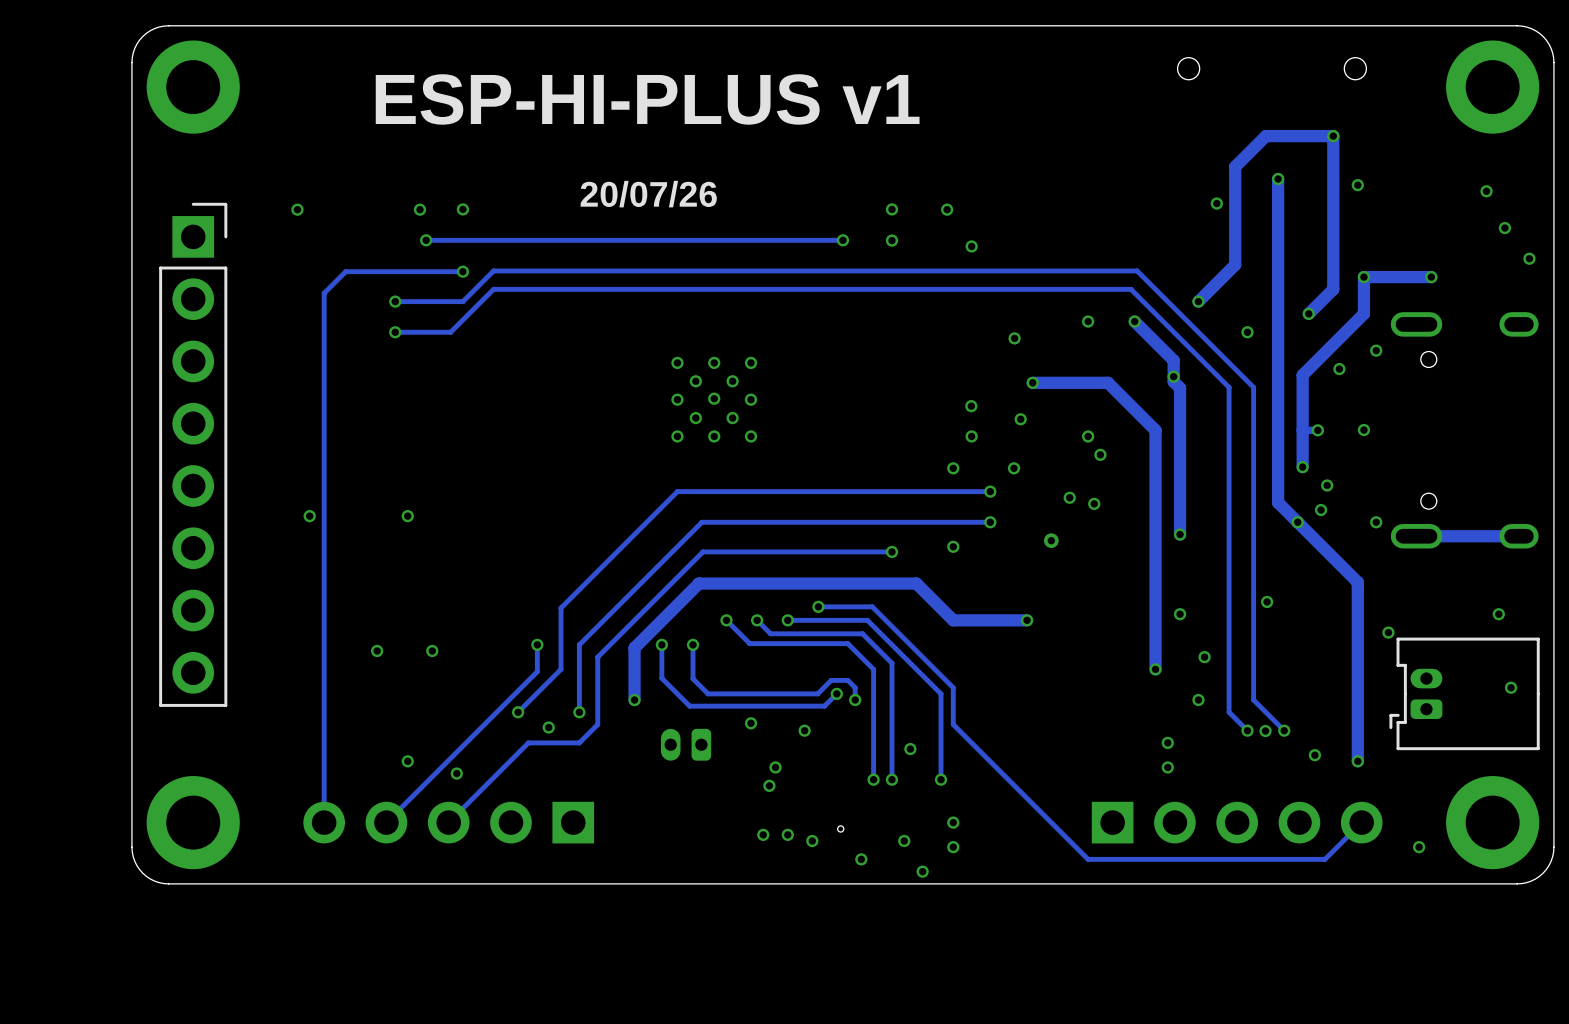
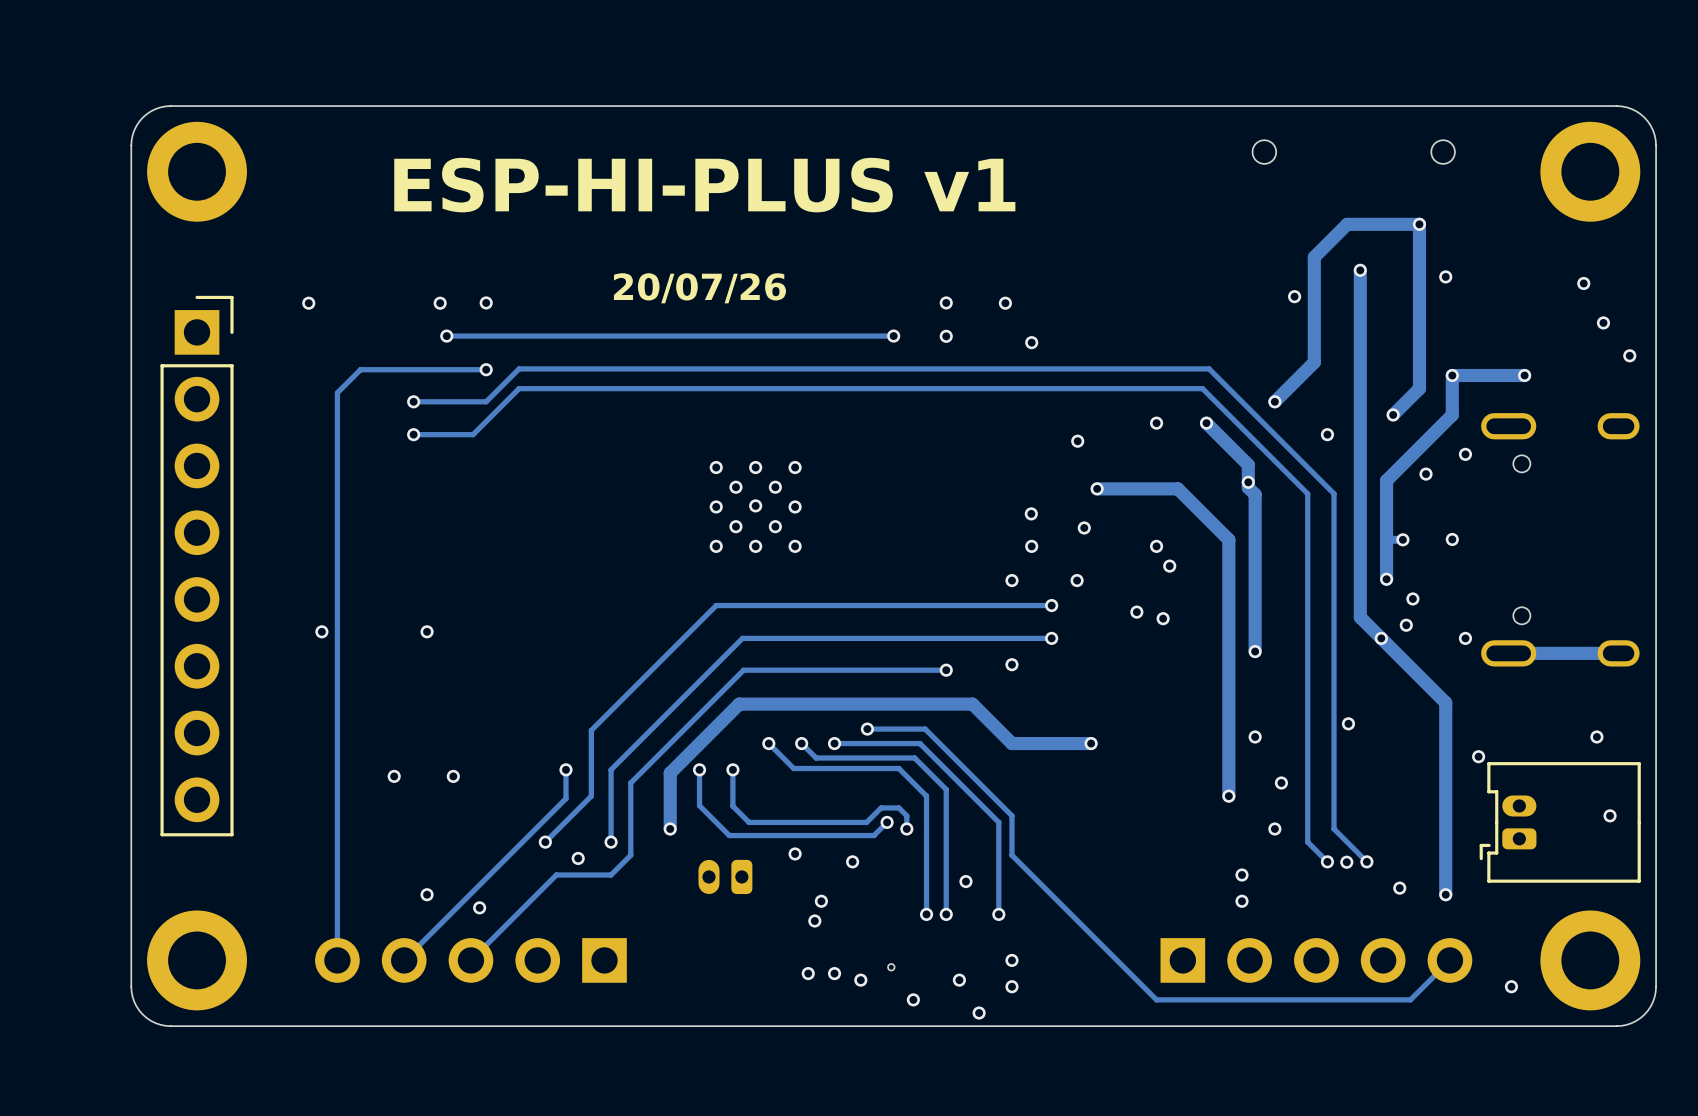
via: (1051, 540) -> none

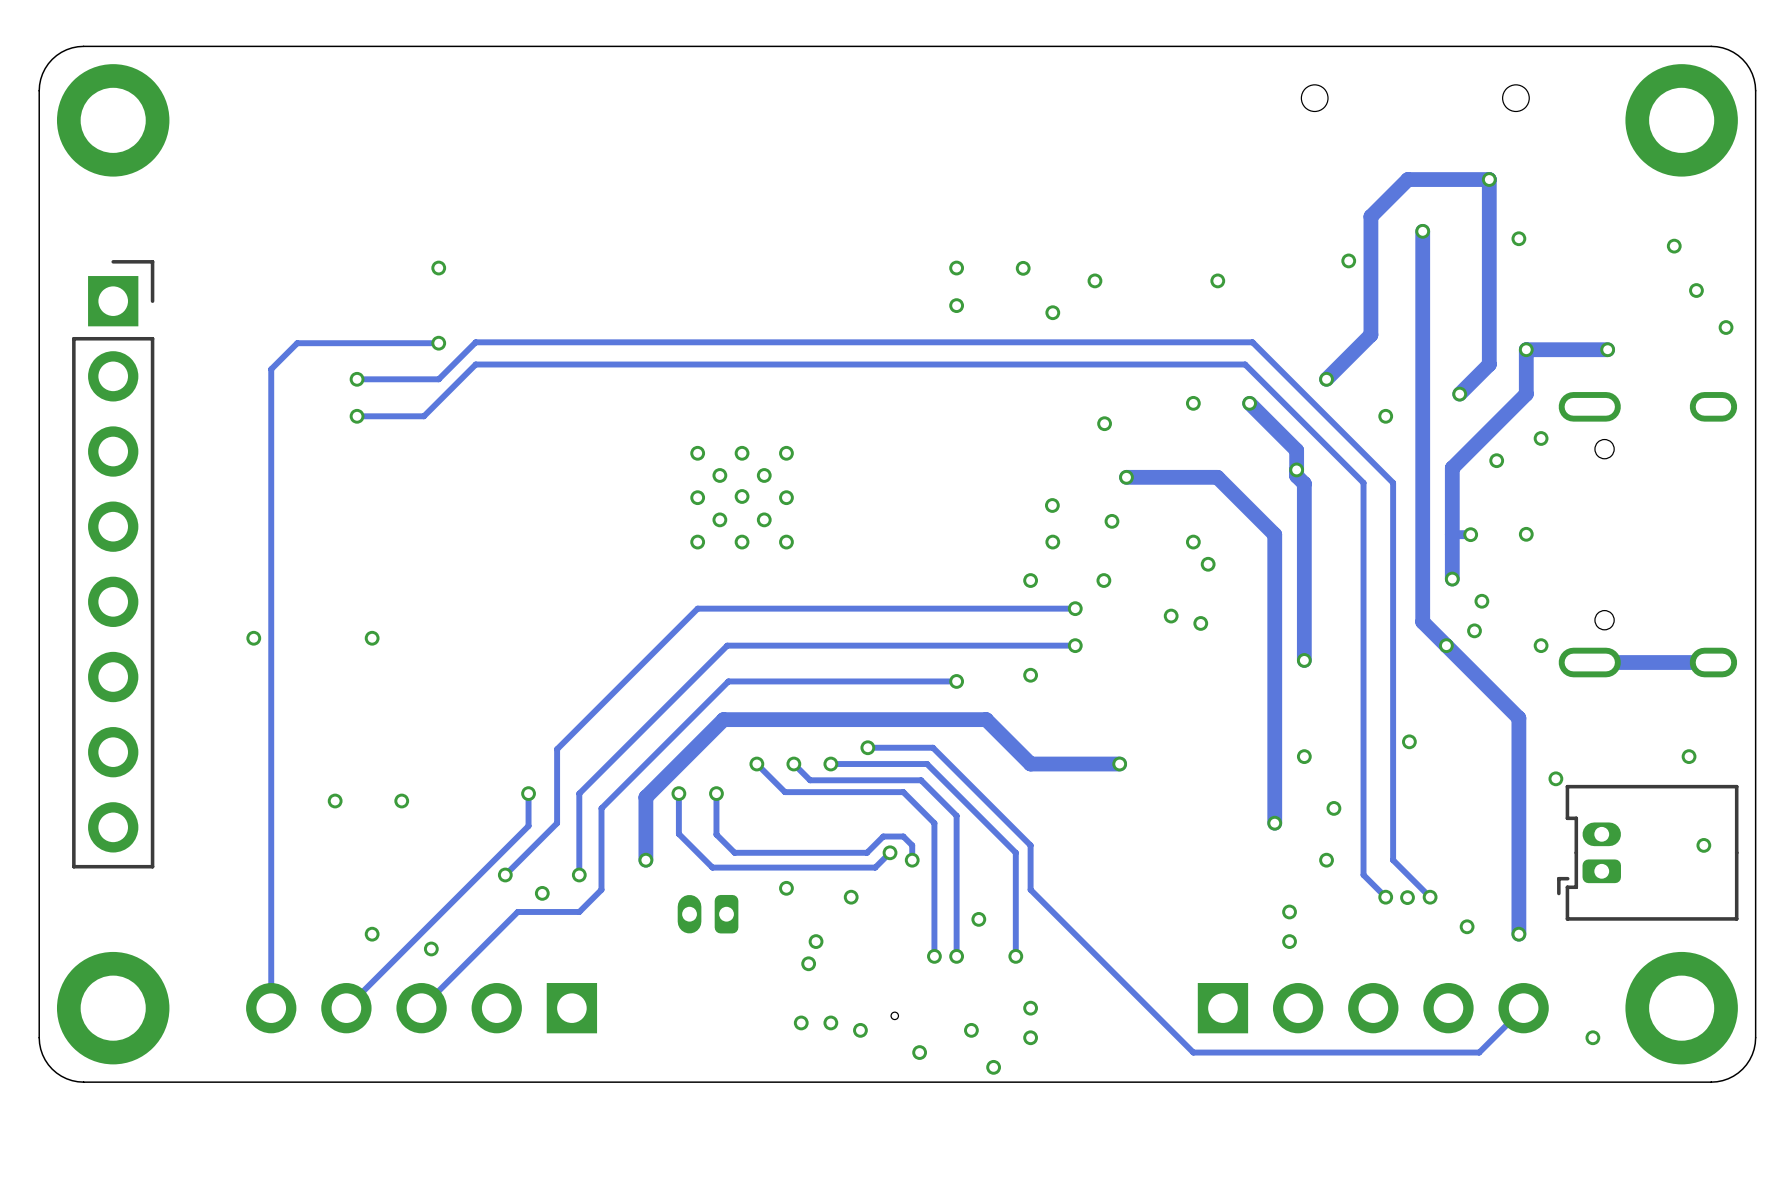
text: ESP-HI-PLUS v1 (704, 185) -> none
text: 20/07/26 (699, 288) -> none
via: (308, 303) -> none
via: (440, 303) -> none
via: none -> (1094, 280)
via: none -> (1217, 280)
via: (446, 336) -> none
track: (893, 336) (446, 336) -> none
via: (893, 336) -> none

